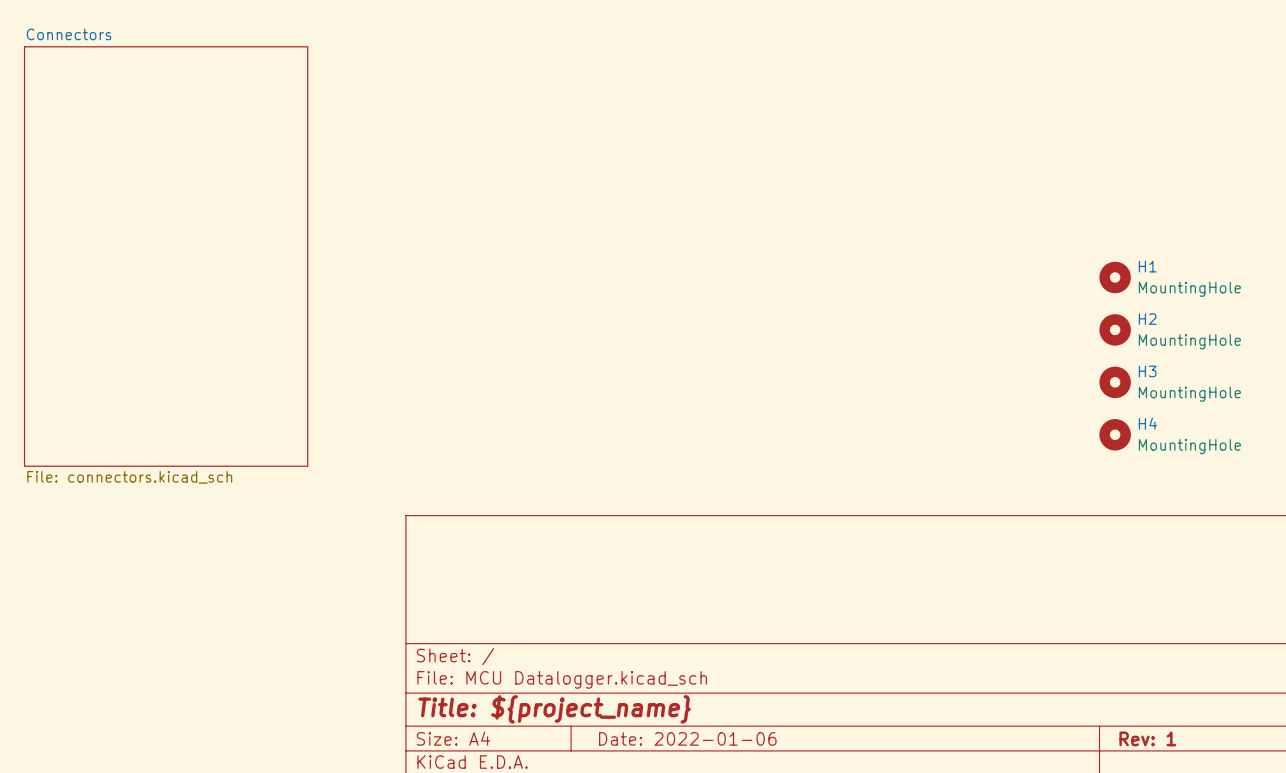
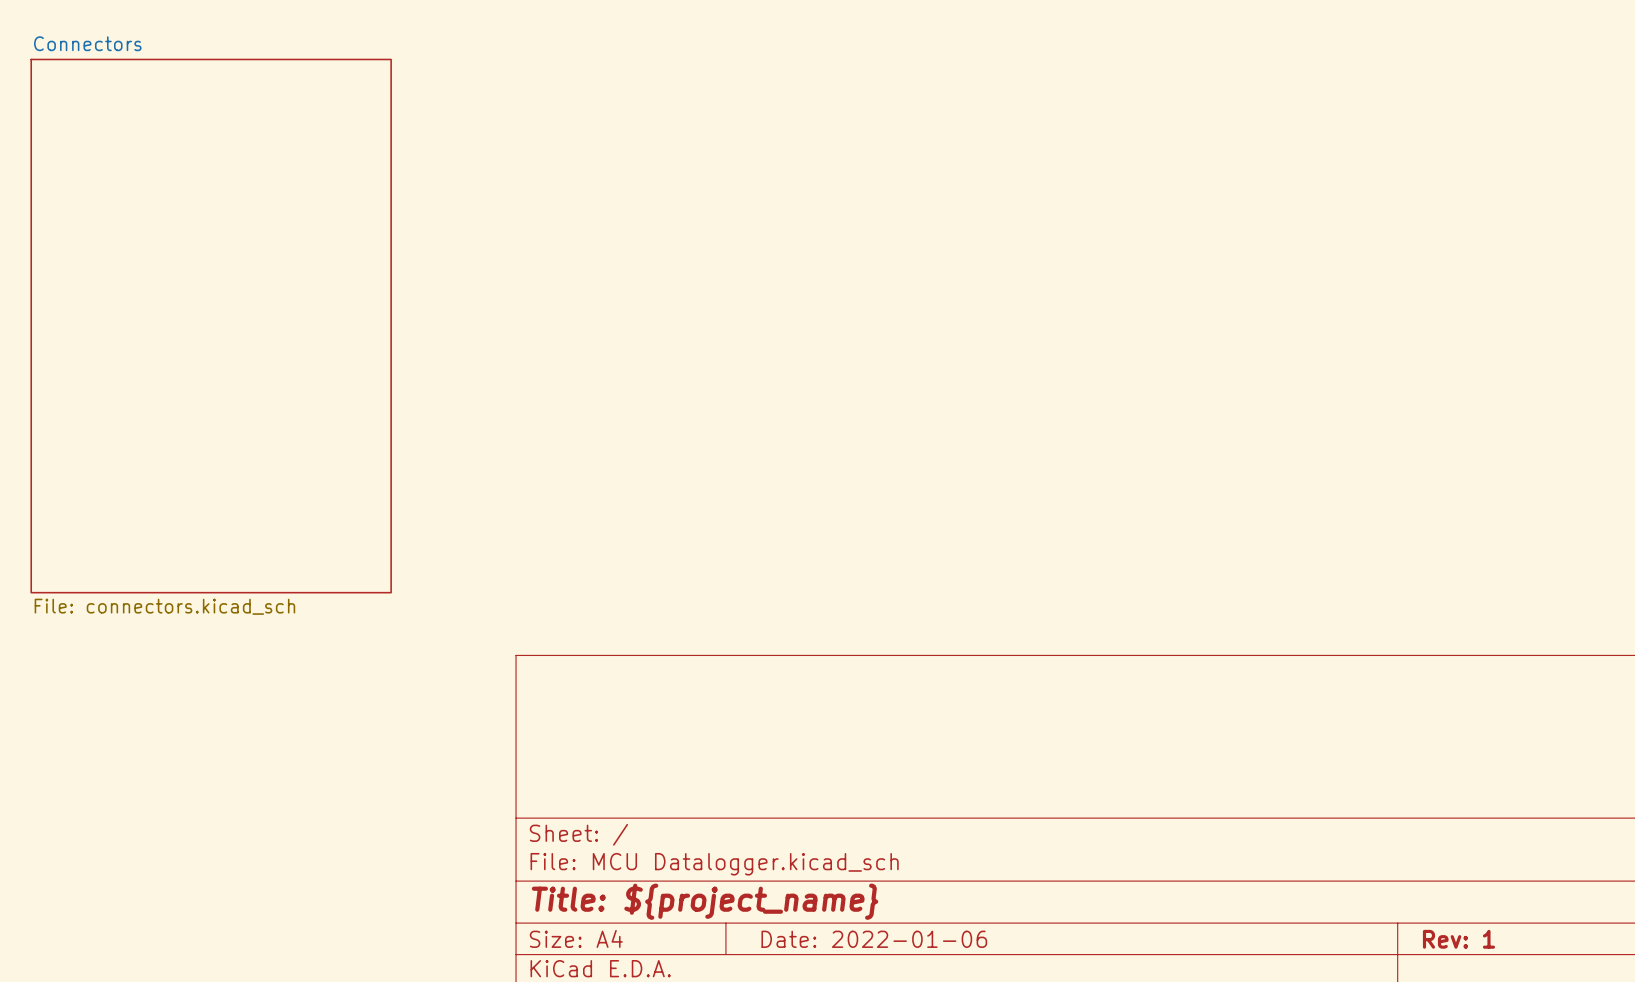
H1: MountingHole (1115, 277) -> none
H2: MountingHole (1115, 329) -> none
H3: MountingHole (1115, 382) -> none
H4: MountingHole (1115, 434) -> none

